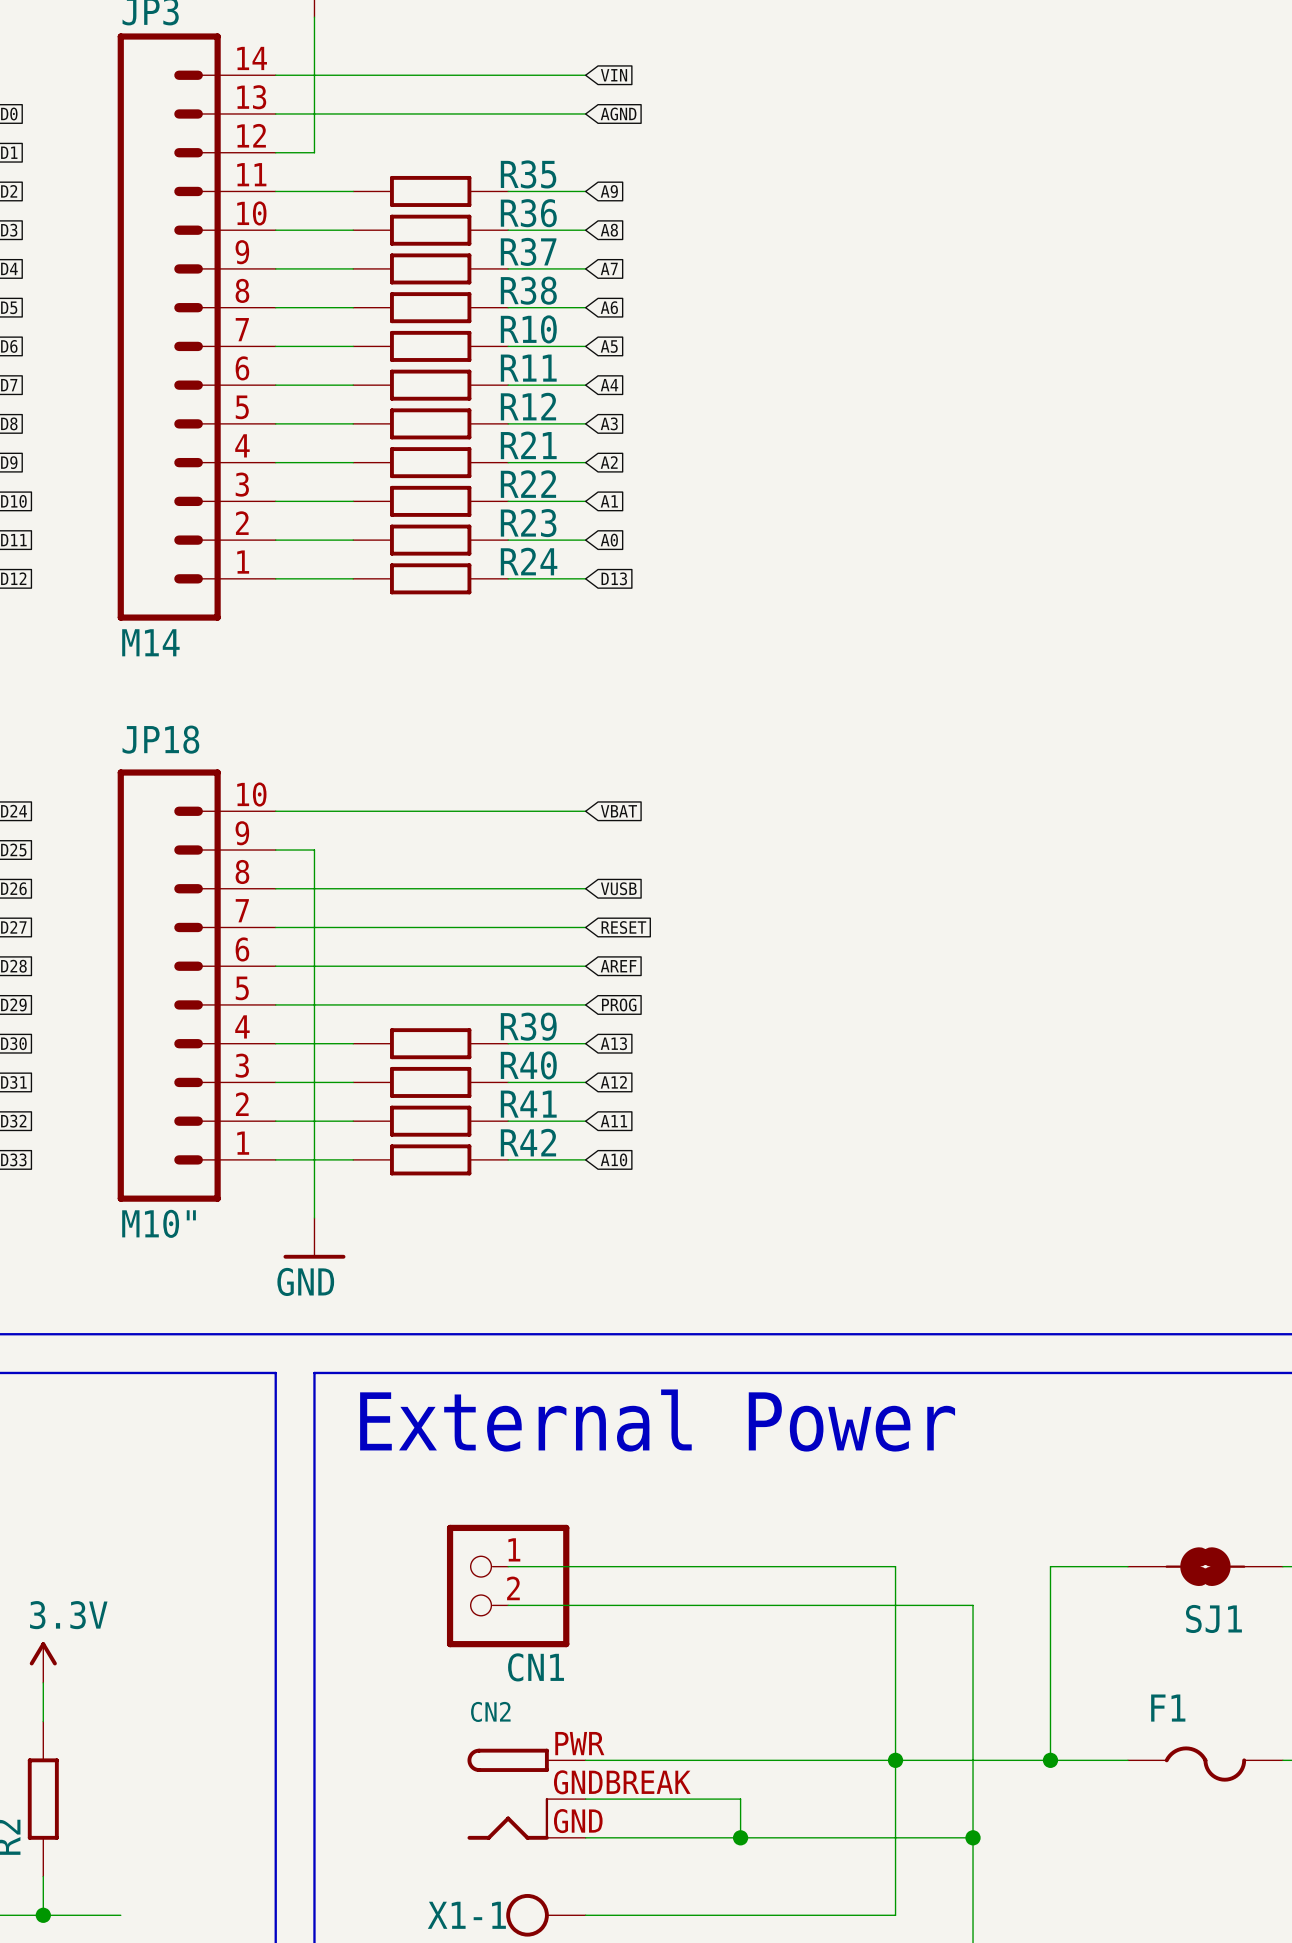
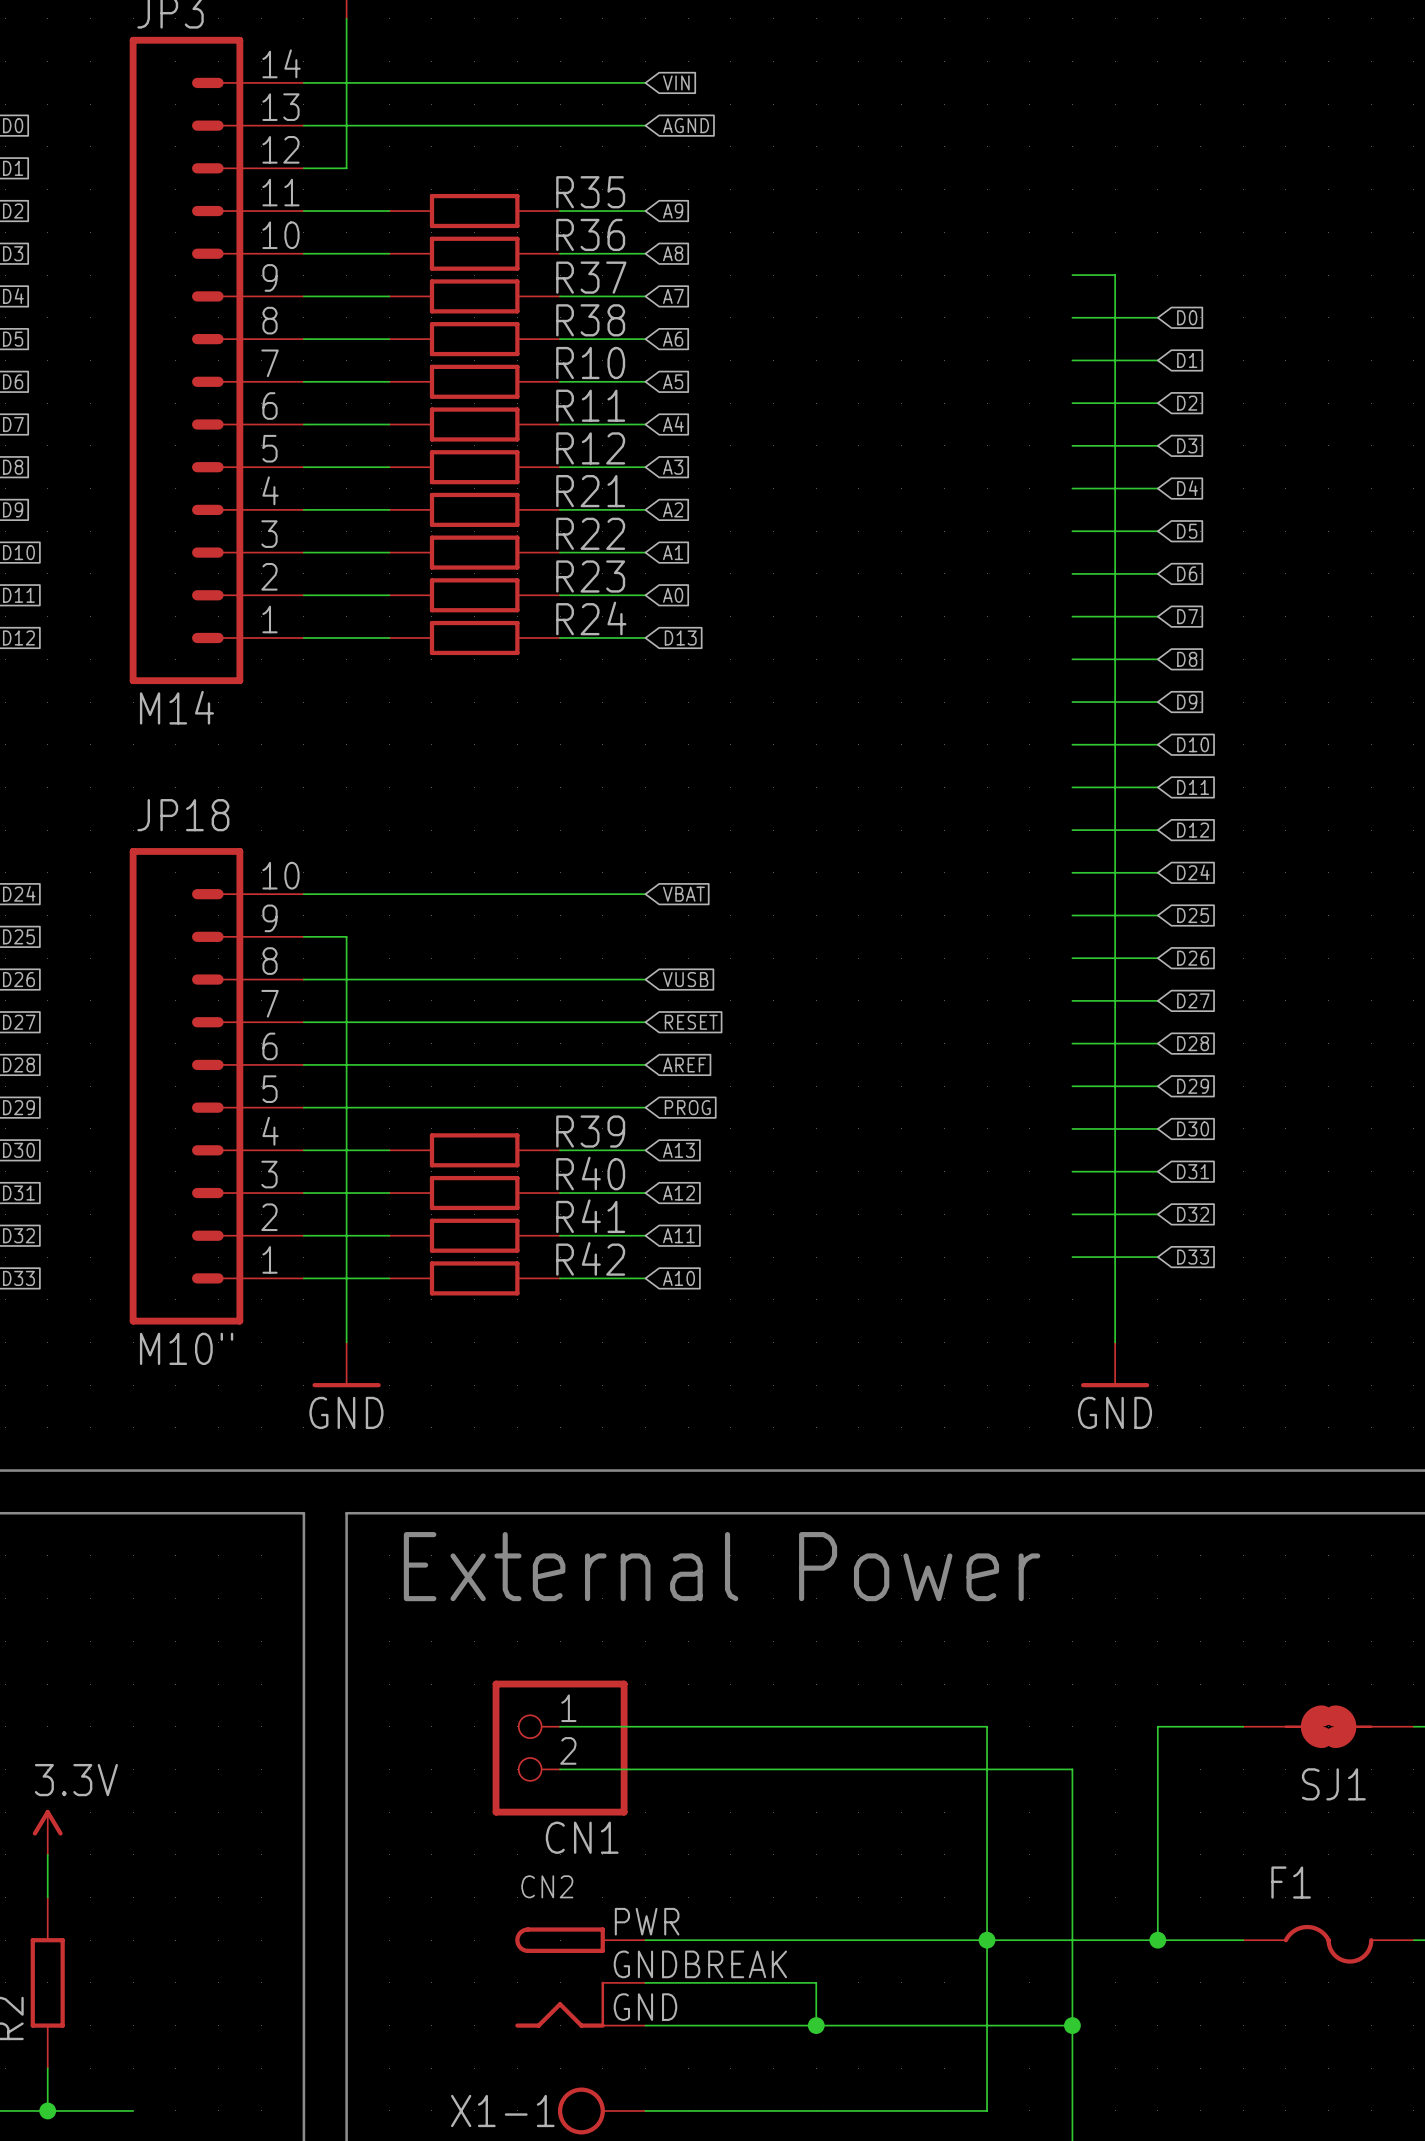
wire: none -> (1072, 275) (1115, 275) (1115, 1342)
wire: none -> (1072, 317) (1157, 317)
global label: none -> D0 (1187, 317)
wire: none -> (1072, 360) (1157, 360)
global label: none -> D1 (1187, 360)
wire: none -> (1072, 403) (1157, 403)
global label: none -> D2 (1187, 403)
wire: none -> (1072, 445) (1157, 445)
global label: none -> D3 (1187, 445)
wire: none -> (1072, 488) (1157, 488)
global label: none -> D4 (1187, 488)
wire: none -> (1072, 531) (1157, 531)
global label: none -> D5 (1187, 531)
wire: none -> (1072, 573) (1157, 573)
global label: none -> D6 (1187, 573)
wire: none -> (1072, 616) (1157, 616)
global label: none -> D7 (1187, 616)
wire: none -> (1072, 659) (1157, 659)
global label: none -> D8 (1187, 659)
wire: none -> (1072, 702) (1157, 702)
global label: none -> D9 (1187, 702)
wire: none -> (1072, 744) (1157, 744)
global label: none -> D10 (1193, 744)
wire: none -> (1072, 787) (1157, 787)
global label: none -> D11 (1193, 787)
wire: none -> (1072, 830) (1157, 830)
global label: none -> D12 (1193, 830)
wire: none -> (1072, 872) (1157, 872)
global label: none -> D24 (1193, 872)
wire: none -> (1072, 915) (1157, 915)
global label: none -> D25 (1193, 915)
wire: none -> (1072, 958) (1157, 958)
global label: none -> D26 (1193, 958)
wire: none -> (1072, 1000) (1157, 1000)
global label: none -> D27 (1193, 1000)
wire: none -> (1072, 1043) (1157, 1043)
global label: none -> D28 (1193, 1043)
wire: none -> (1072, 1086) (1157, 1086)
global label: none -> D29 (1193, 1086)
wire: none -> (1072, 1128) (1157, 1128)
global label: none -> D30 (1193, 1128)
wire: none -> (1072, 1171) (1157, 1171)
global label: none -> D31 (1193, 1171)
wire: none -> (1072, 1214) (1157, 1214)
global label: none -> D32 (1193, 1214)
wire: none -> (1072, 1257) (1157, 1257)
global label: none -> D33 (1193, 1257)
power symbol: none -> GND (1115, 1364)

